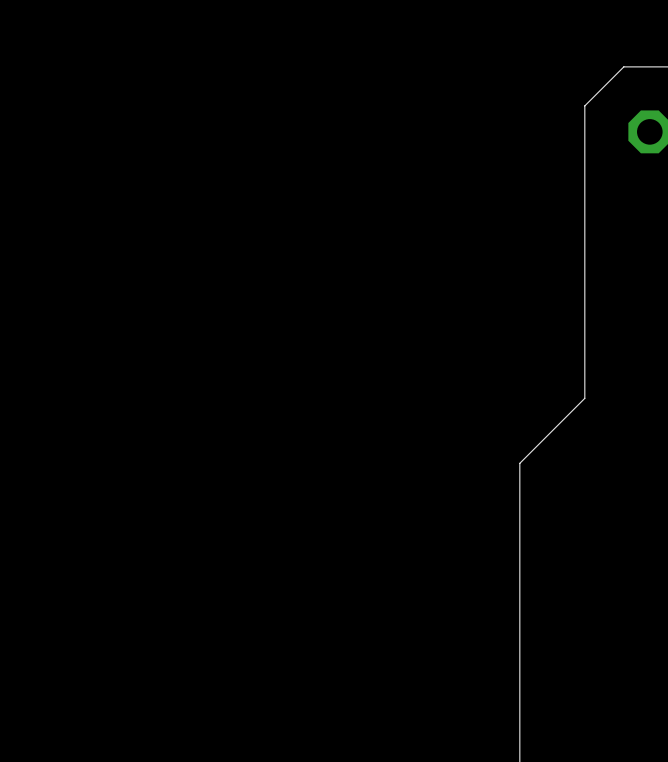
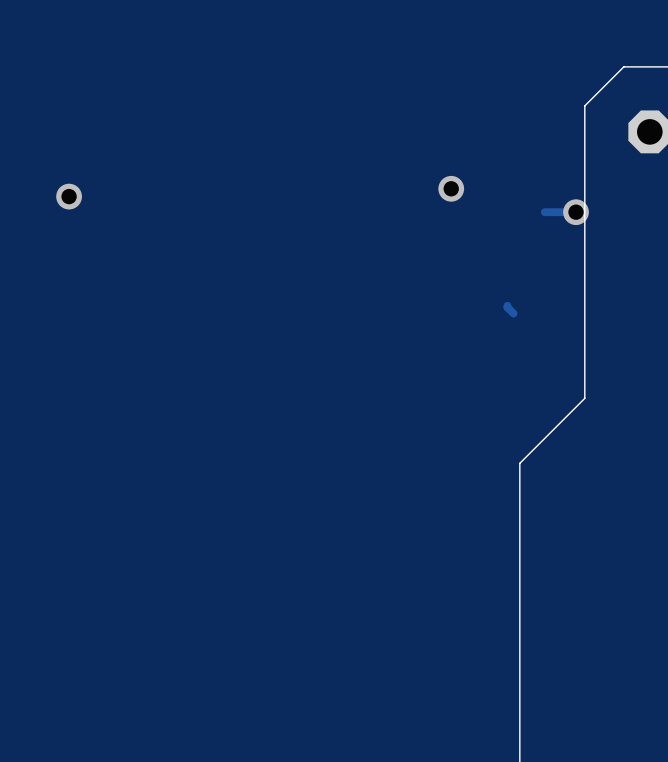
via: none -> (451, 188)
via: none -> (69, 196)
track: none -> (576, 212) (544, 212)
via: none -> (576, 212)
track: none -> (507, 305) (513, 313)

